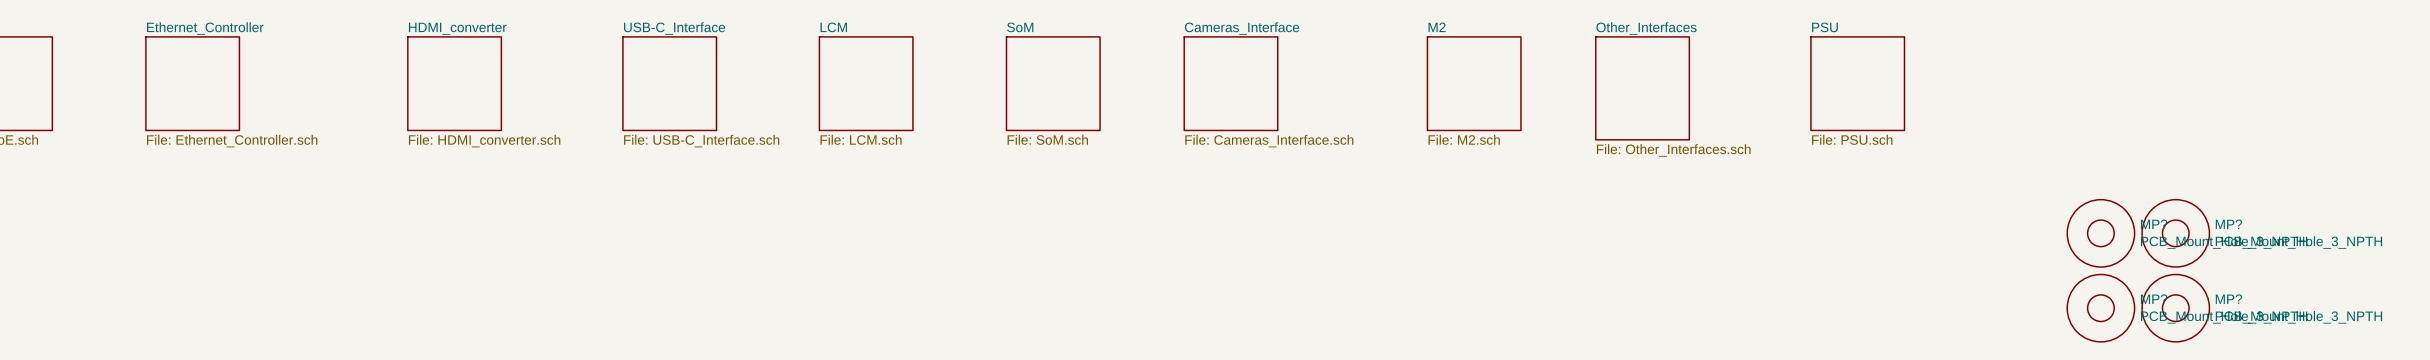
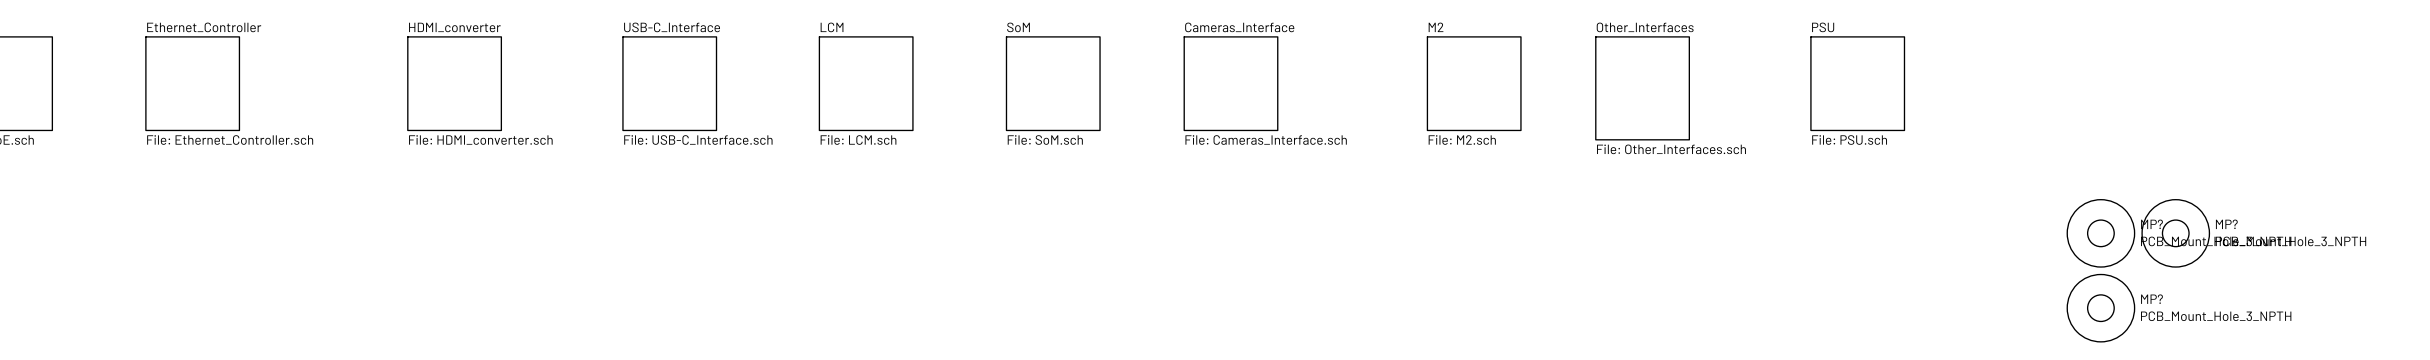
MP?: PCB_Mount_Hole_3_NPTH (2175, 308) -> none

